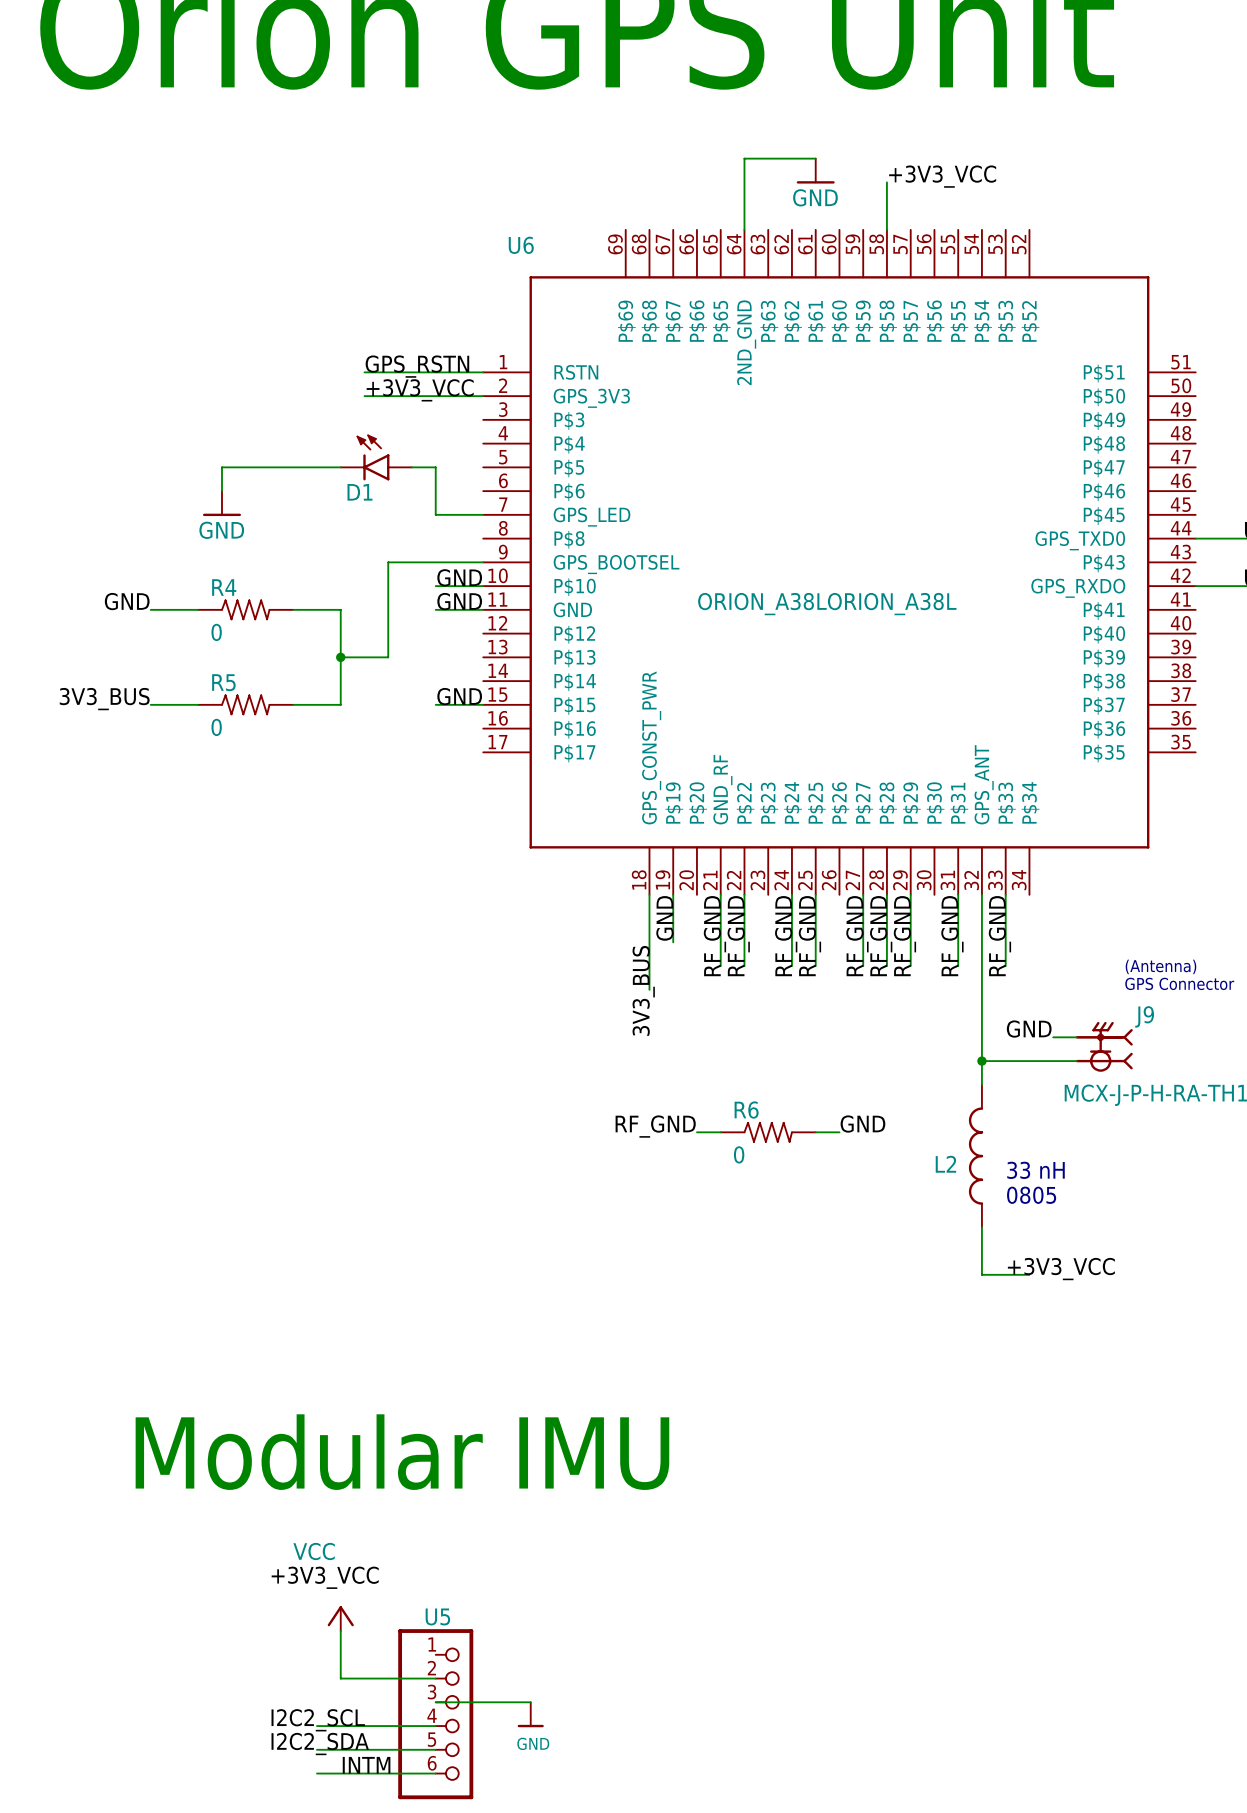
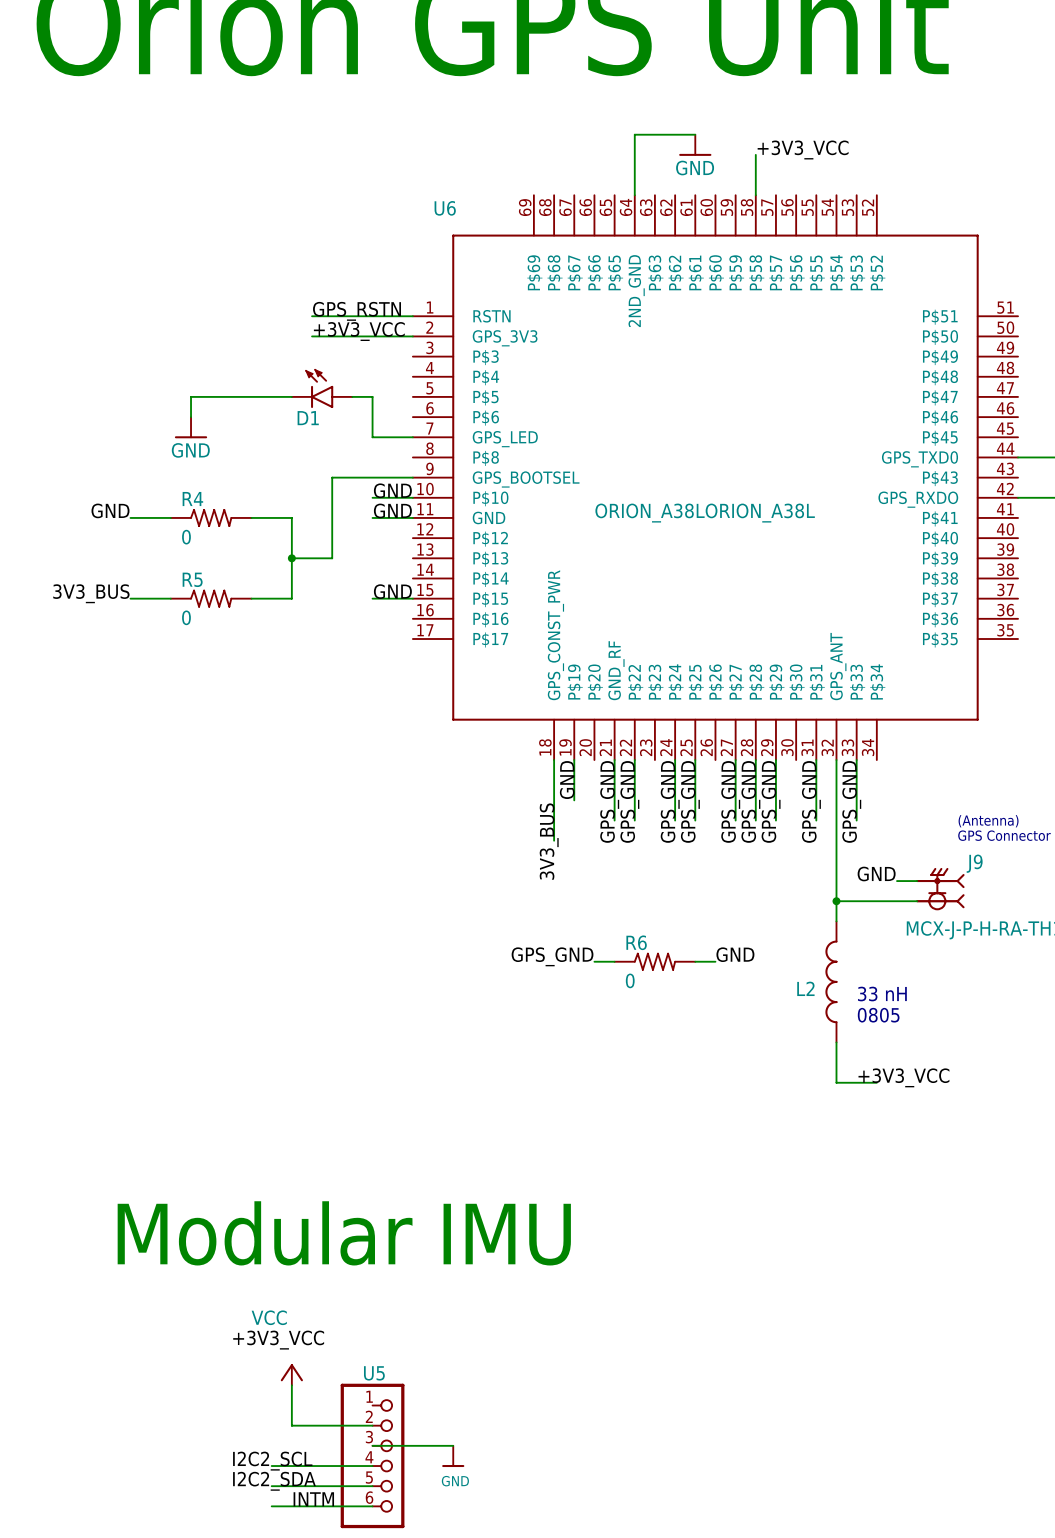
label: RF_GND (714, 936) -> GPS_GND (609, 801)
label: RF_GND (738, 936) -> GPS_GND (629, 801)
label: RF_GND (786, 936) -> GPS_GND (670, 801)
label: RF_GND (809, 936) -> GPS_GND (690, 801)
label: RF_GND (857, 936) -> GPS_GND (730, 801)
label: RF_GND (881, 936) -> GPS_GND (750, 801)
label: RF_GND (904, 936) -> GPS_GND (771, 801)
label: RF_GND (952, 936) -> GPS_GND (811, 801)
label: RF_GND (999, 936) -> GPS_GND (851, 801)
label: RF_GND (655, 1126) -> GPS_GND (552, 956)

